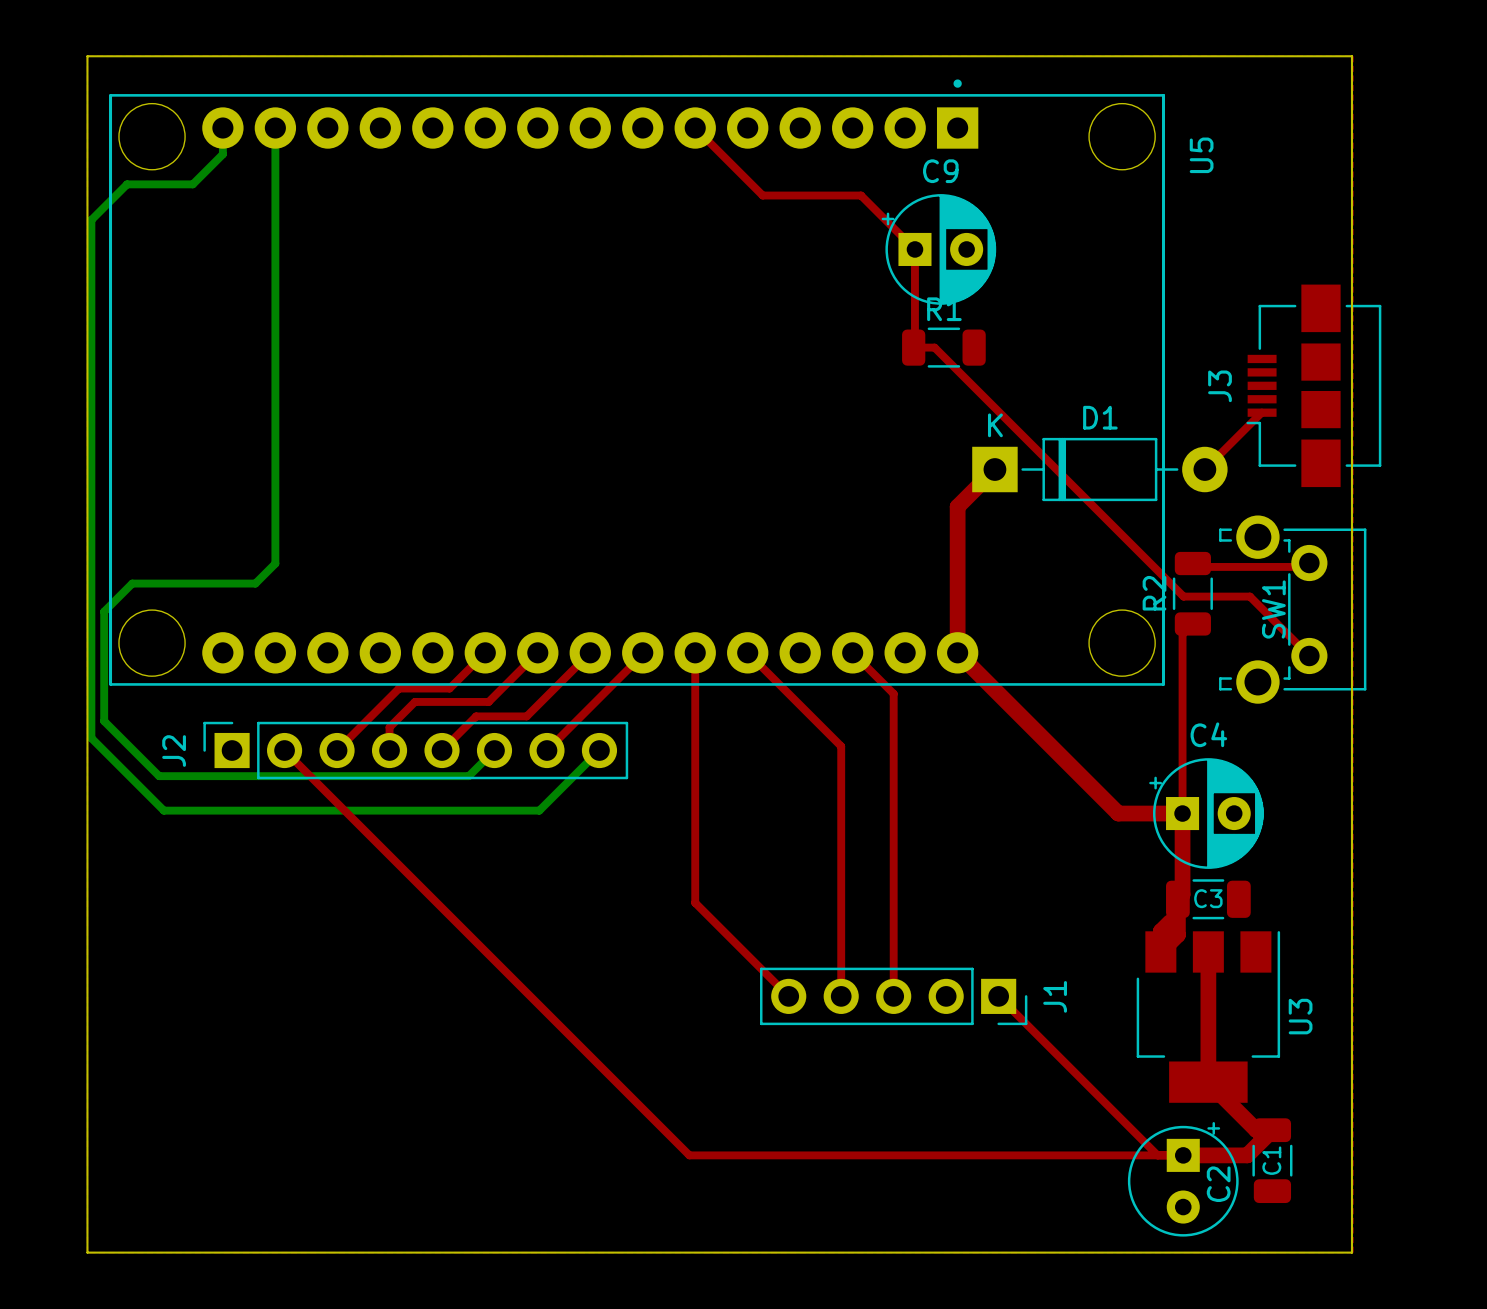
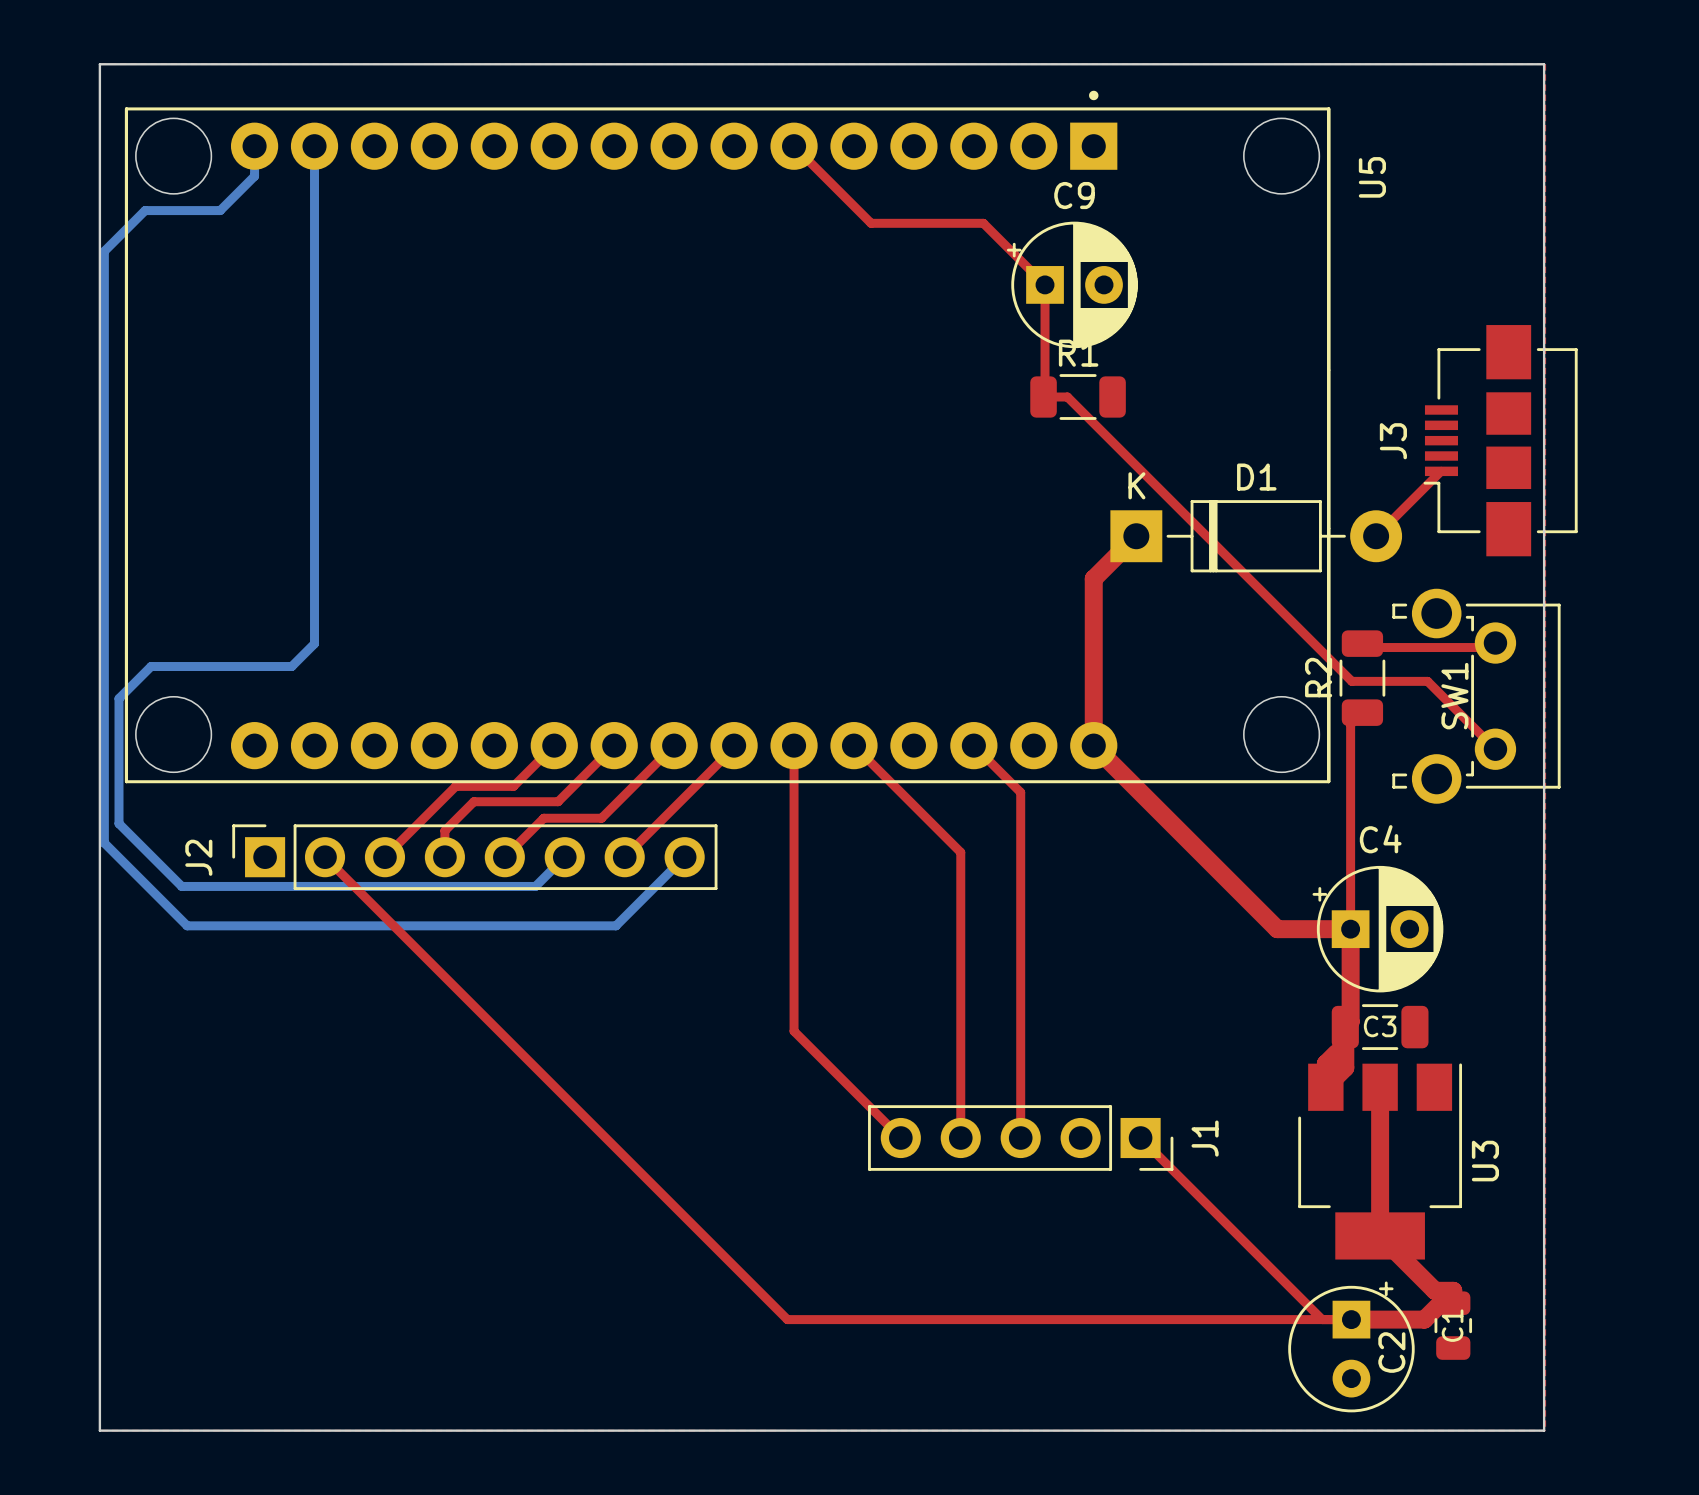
C1 footprint: [1252, 1118, 1293, 1204] -> [1434, 1291, 1473, 1360]

